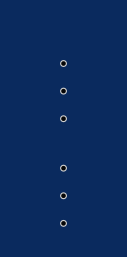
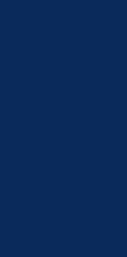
part: (63, 91) -> none
part: (63, 195) -> none

